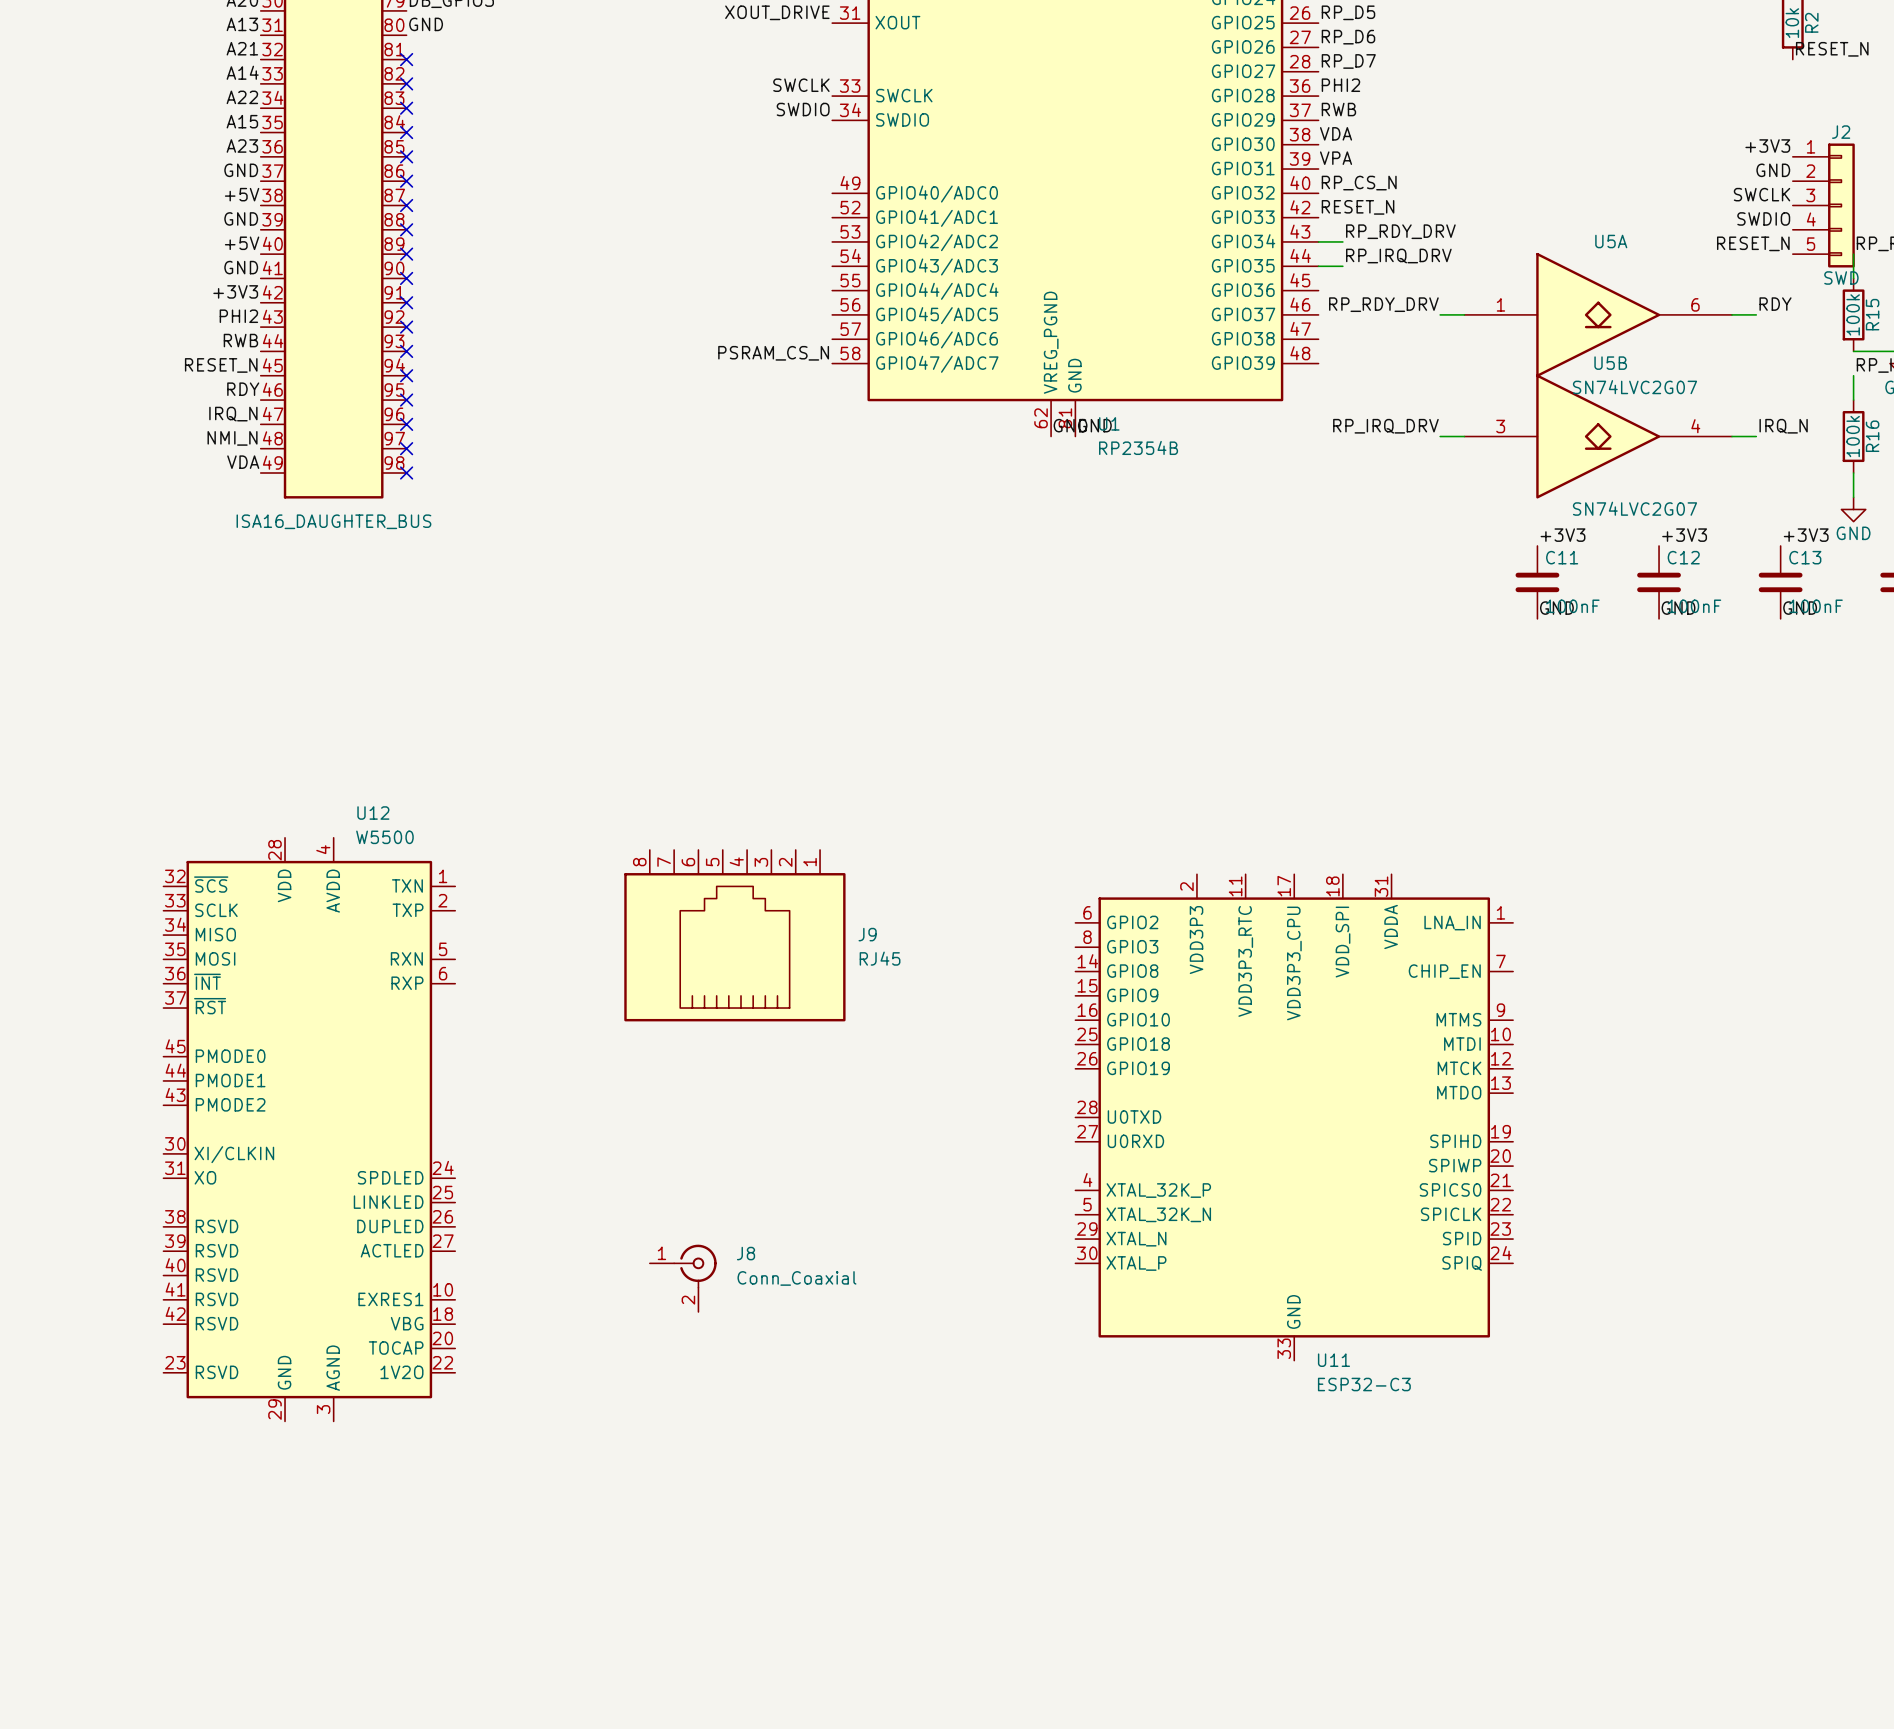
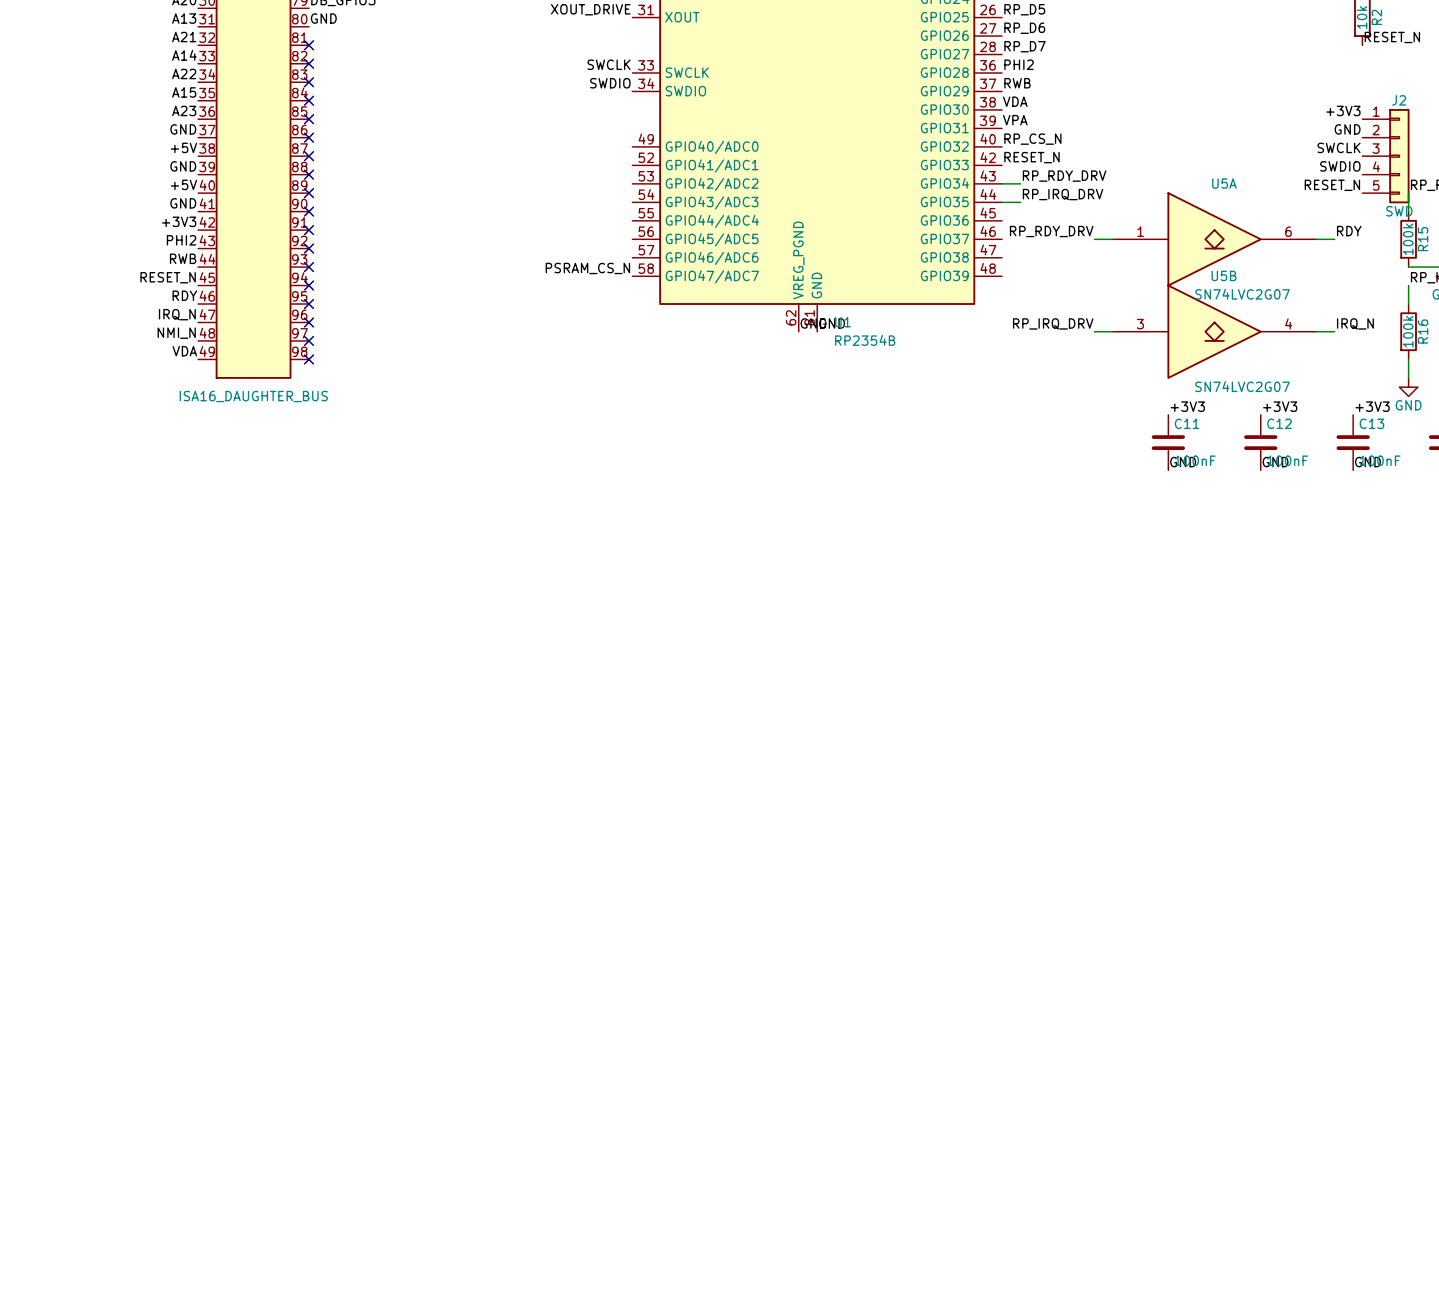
J9: RJ45 (734, 935) -> none
U11: ESP32-C3 (1294, 1117) -> none
U12: W5500 (309, 1129) -> none
J8: Conn_Coaxial (683, 1278) -> none

